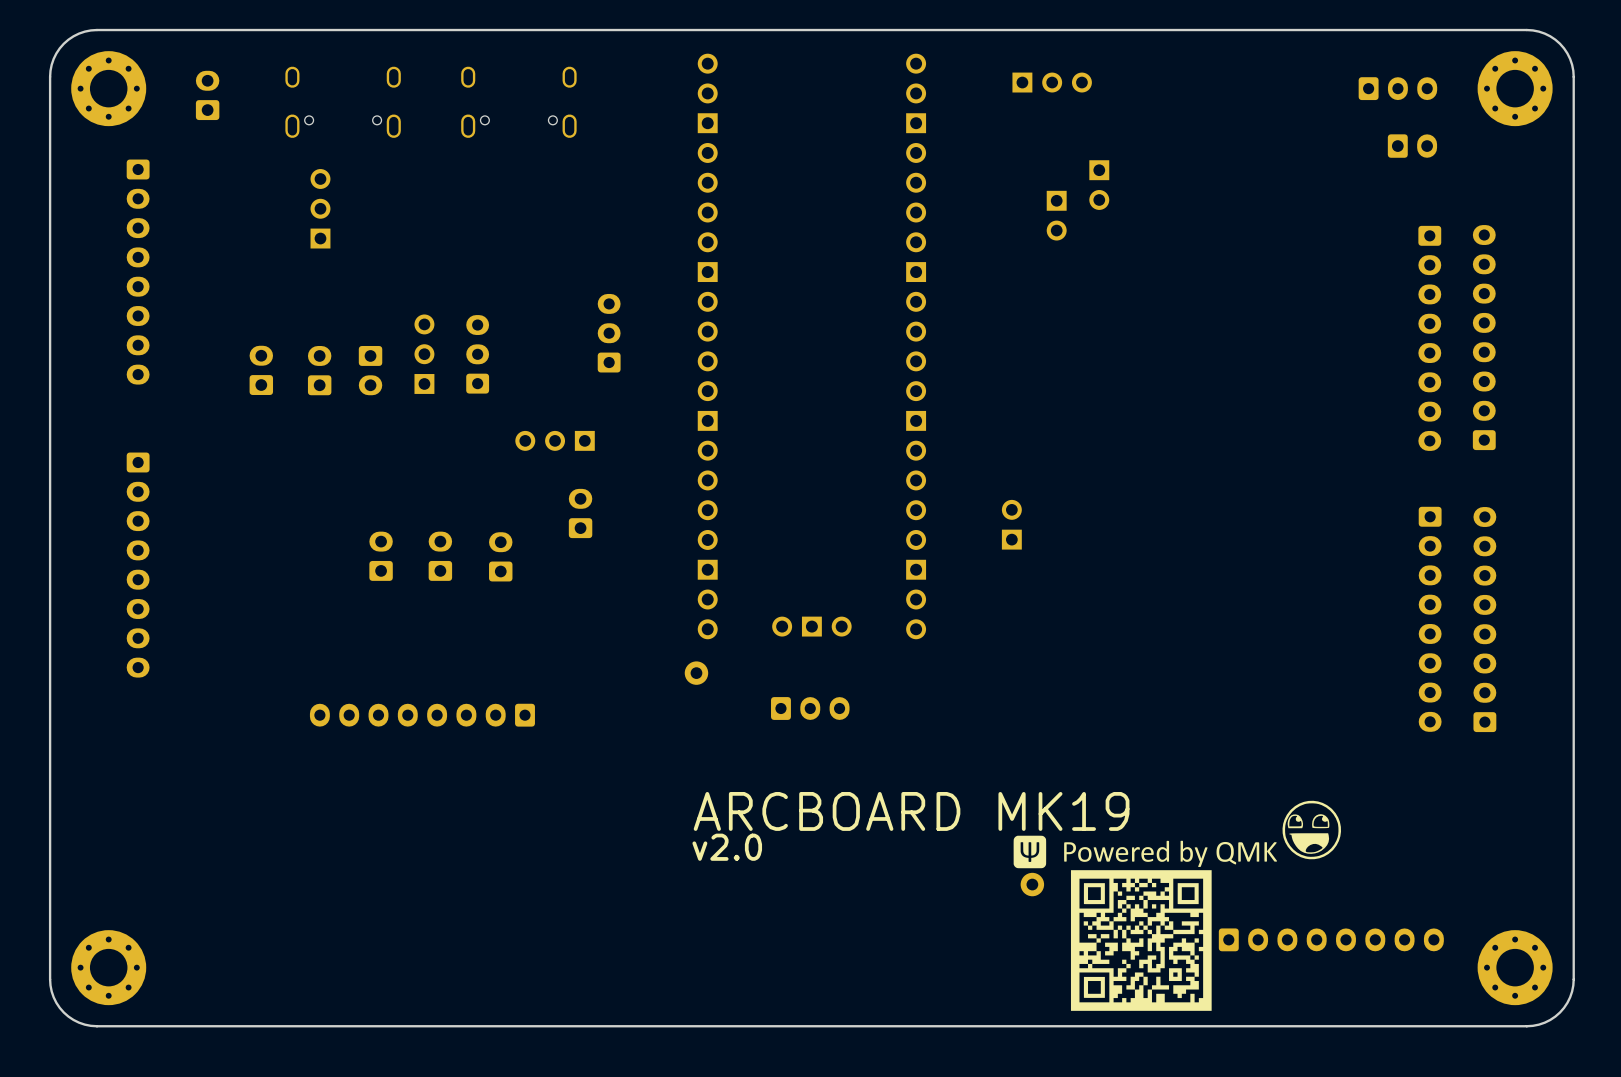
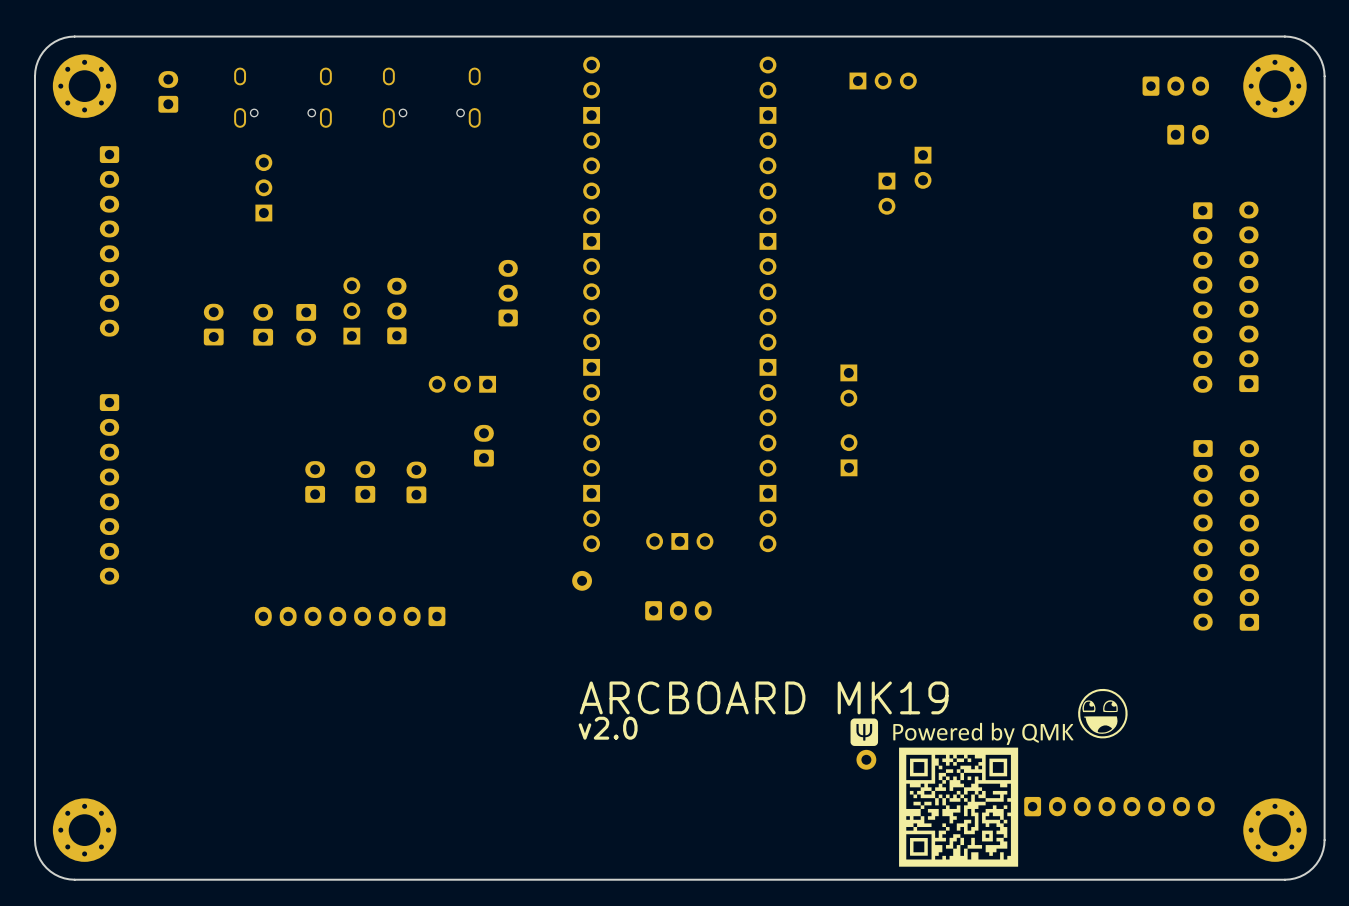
part: none -> (848, 385)

